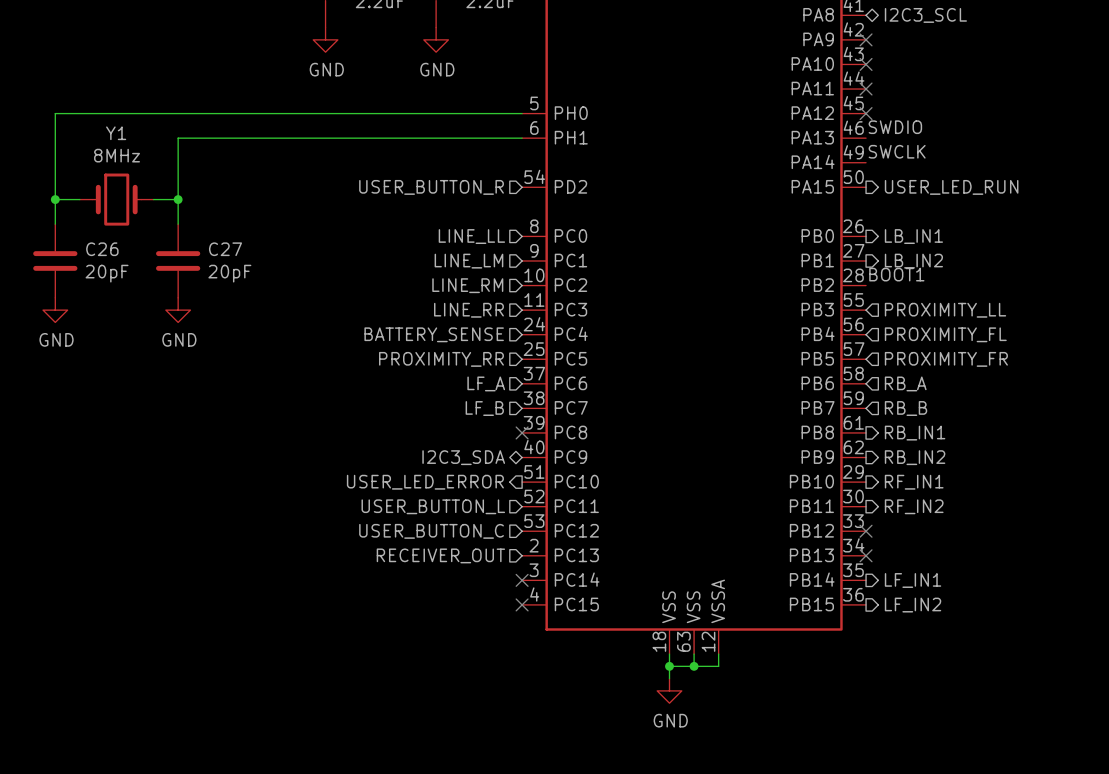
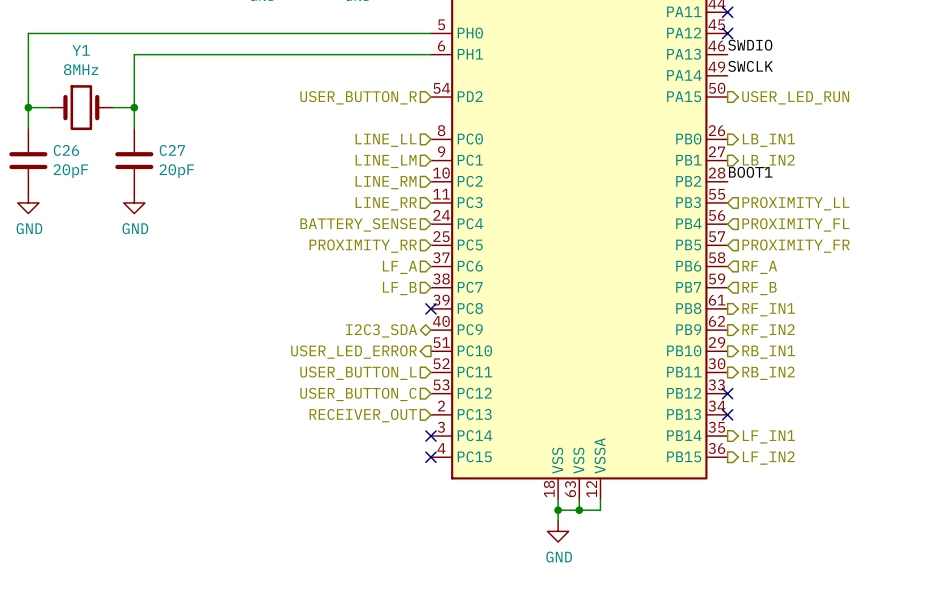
hierarchical label: RB_A (905, 383) -> RF_A (759, 267)
hierarchical label: RB_B (906, 408) -> RF_B (759, 288)
hierarchical label: RB_IN1 (915, 433) -> RF_IN1 (768, 309)
hierarchical label: RB_IN2 (915, 457) -> RF_IN2 (768, 330)
hierarchical label: RF_IN1 (914, 482) -> RB_IN1 (768, 352)
hierarchical label: RF_IN2 (914, 506) -> RB_IN2 (768, 373)

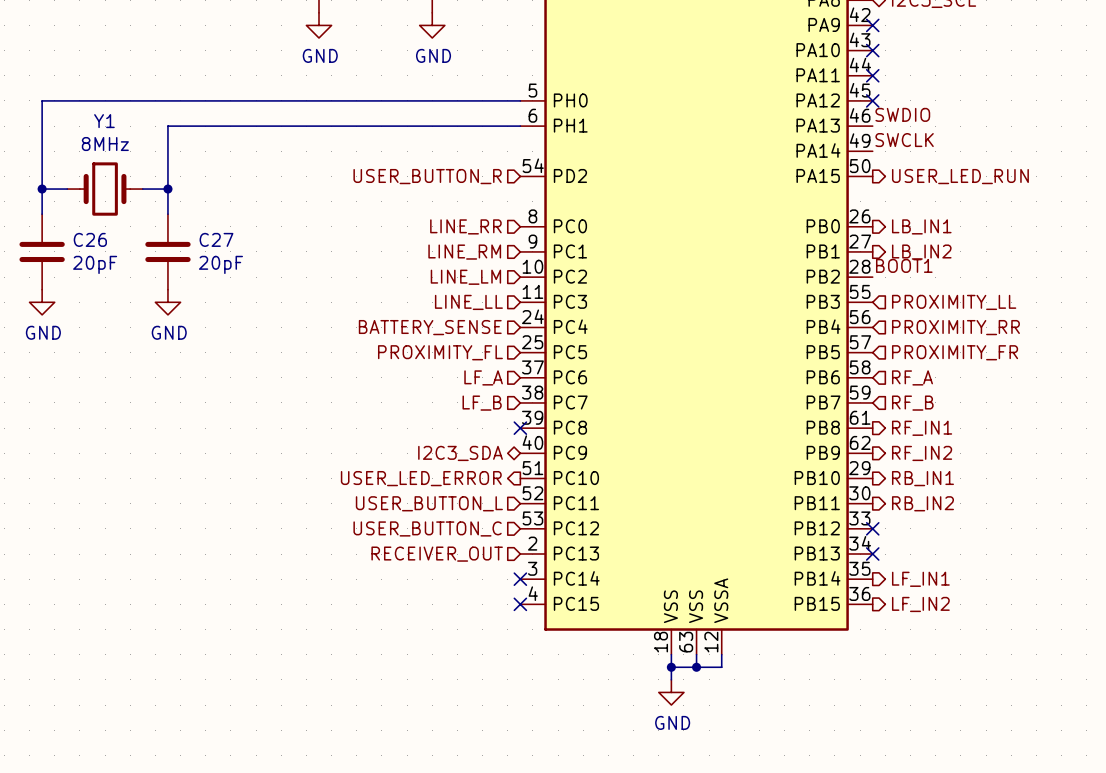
hierarchical label: LINE_LL (386, 140) -> LINE_RR (465, 226)
hierarchical label: LINE_LM (386, 161) -> LINE_RM (464, 252)
hierarchical label: LINE_RM (386, 182) -> LINE_LM (465, 277)
hierarchical label: LINE_RR (386, 203) -> LINE_LL (468, 302)
hierarchical label: PROXIMITY_FL (795, 224) -> PROXIMITY_RR (955, 327)
hierarchical label: PROXIMITY_RR (363, 246) -> PROXIMITY_FL (440, 352)

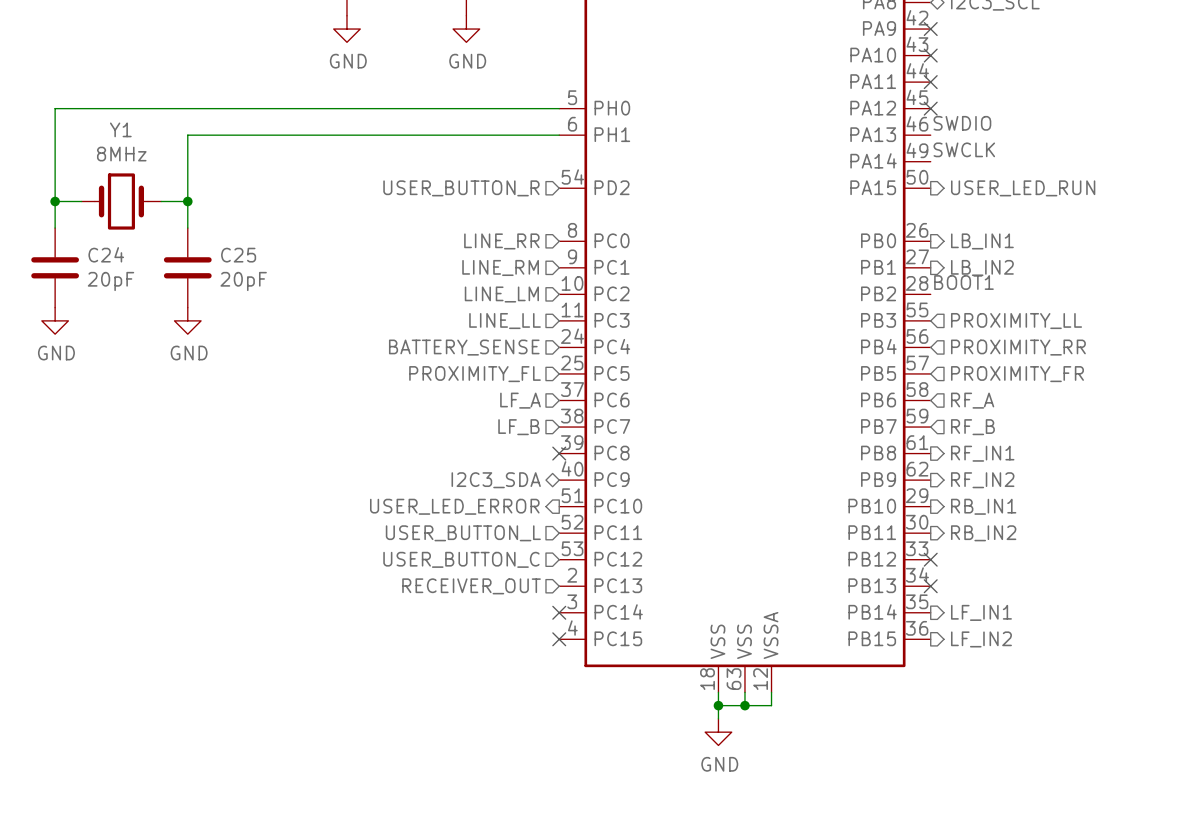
C26 name: C26 (90, 239) -> C24 (106, 254)
C27 name: C27 (216, 239) -> C25 (238, 255)

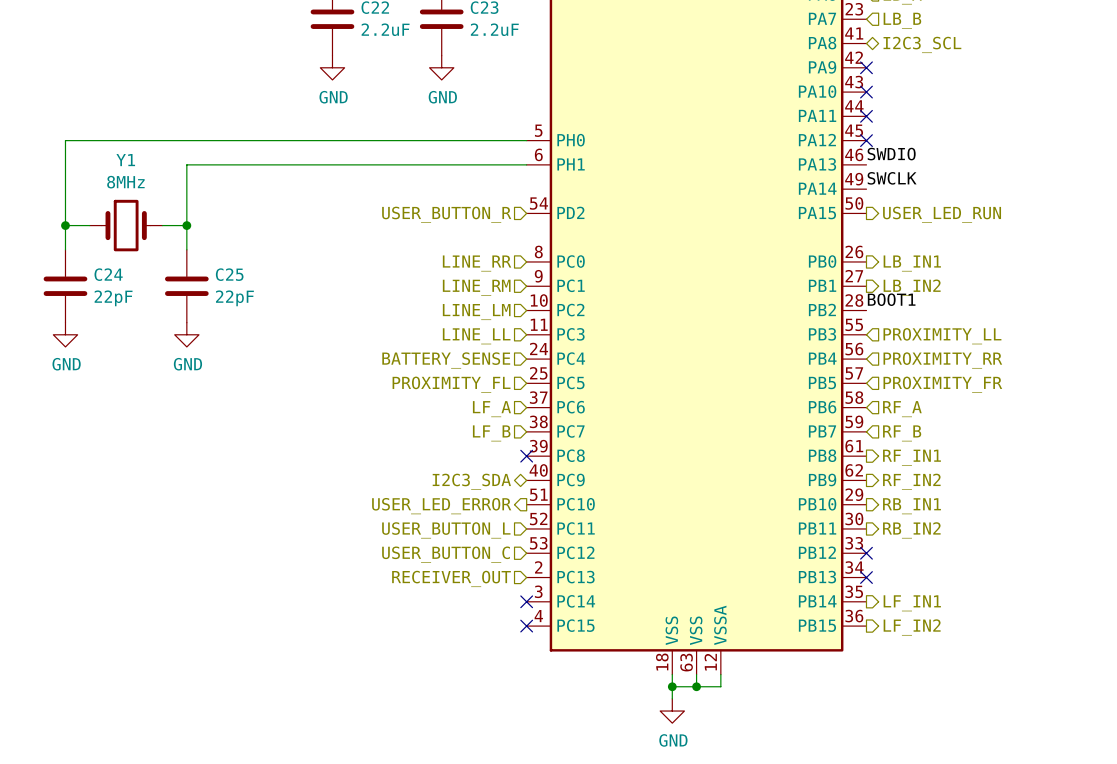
C24 value: 20pF (111, 281) -> 22pF (113, 298)
C25 value: 20pF (243, 281) -> 22pF (234, 298)

